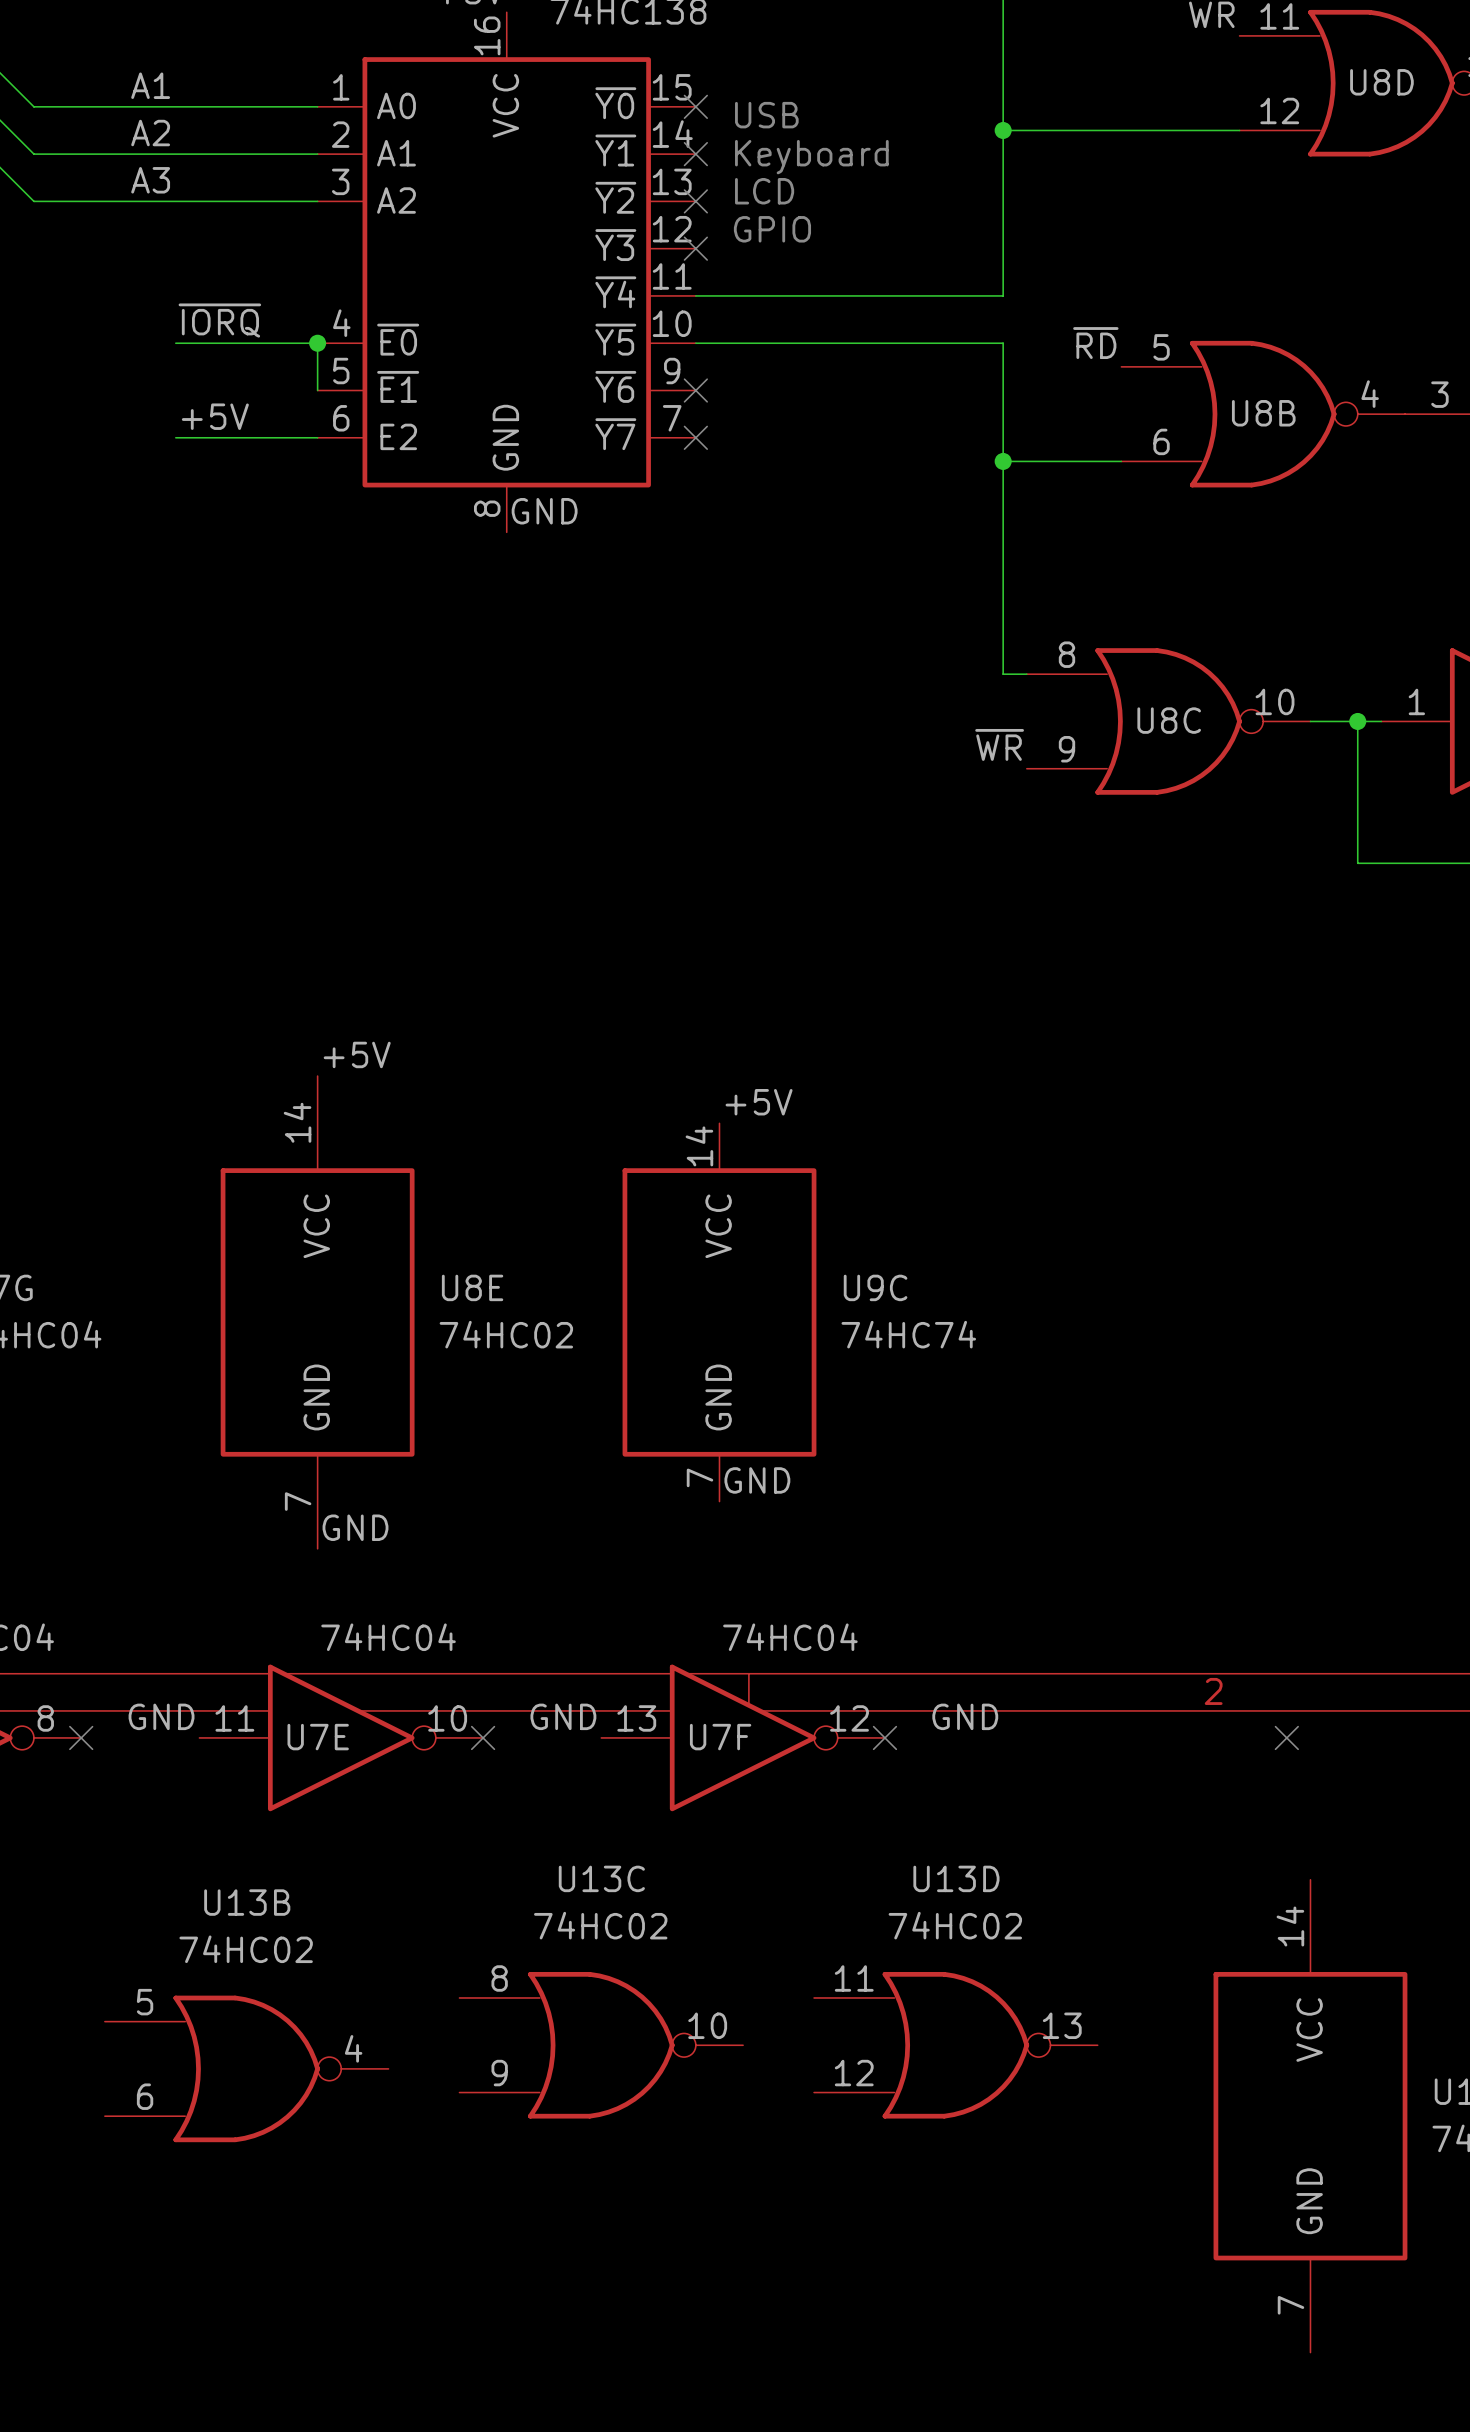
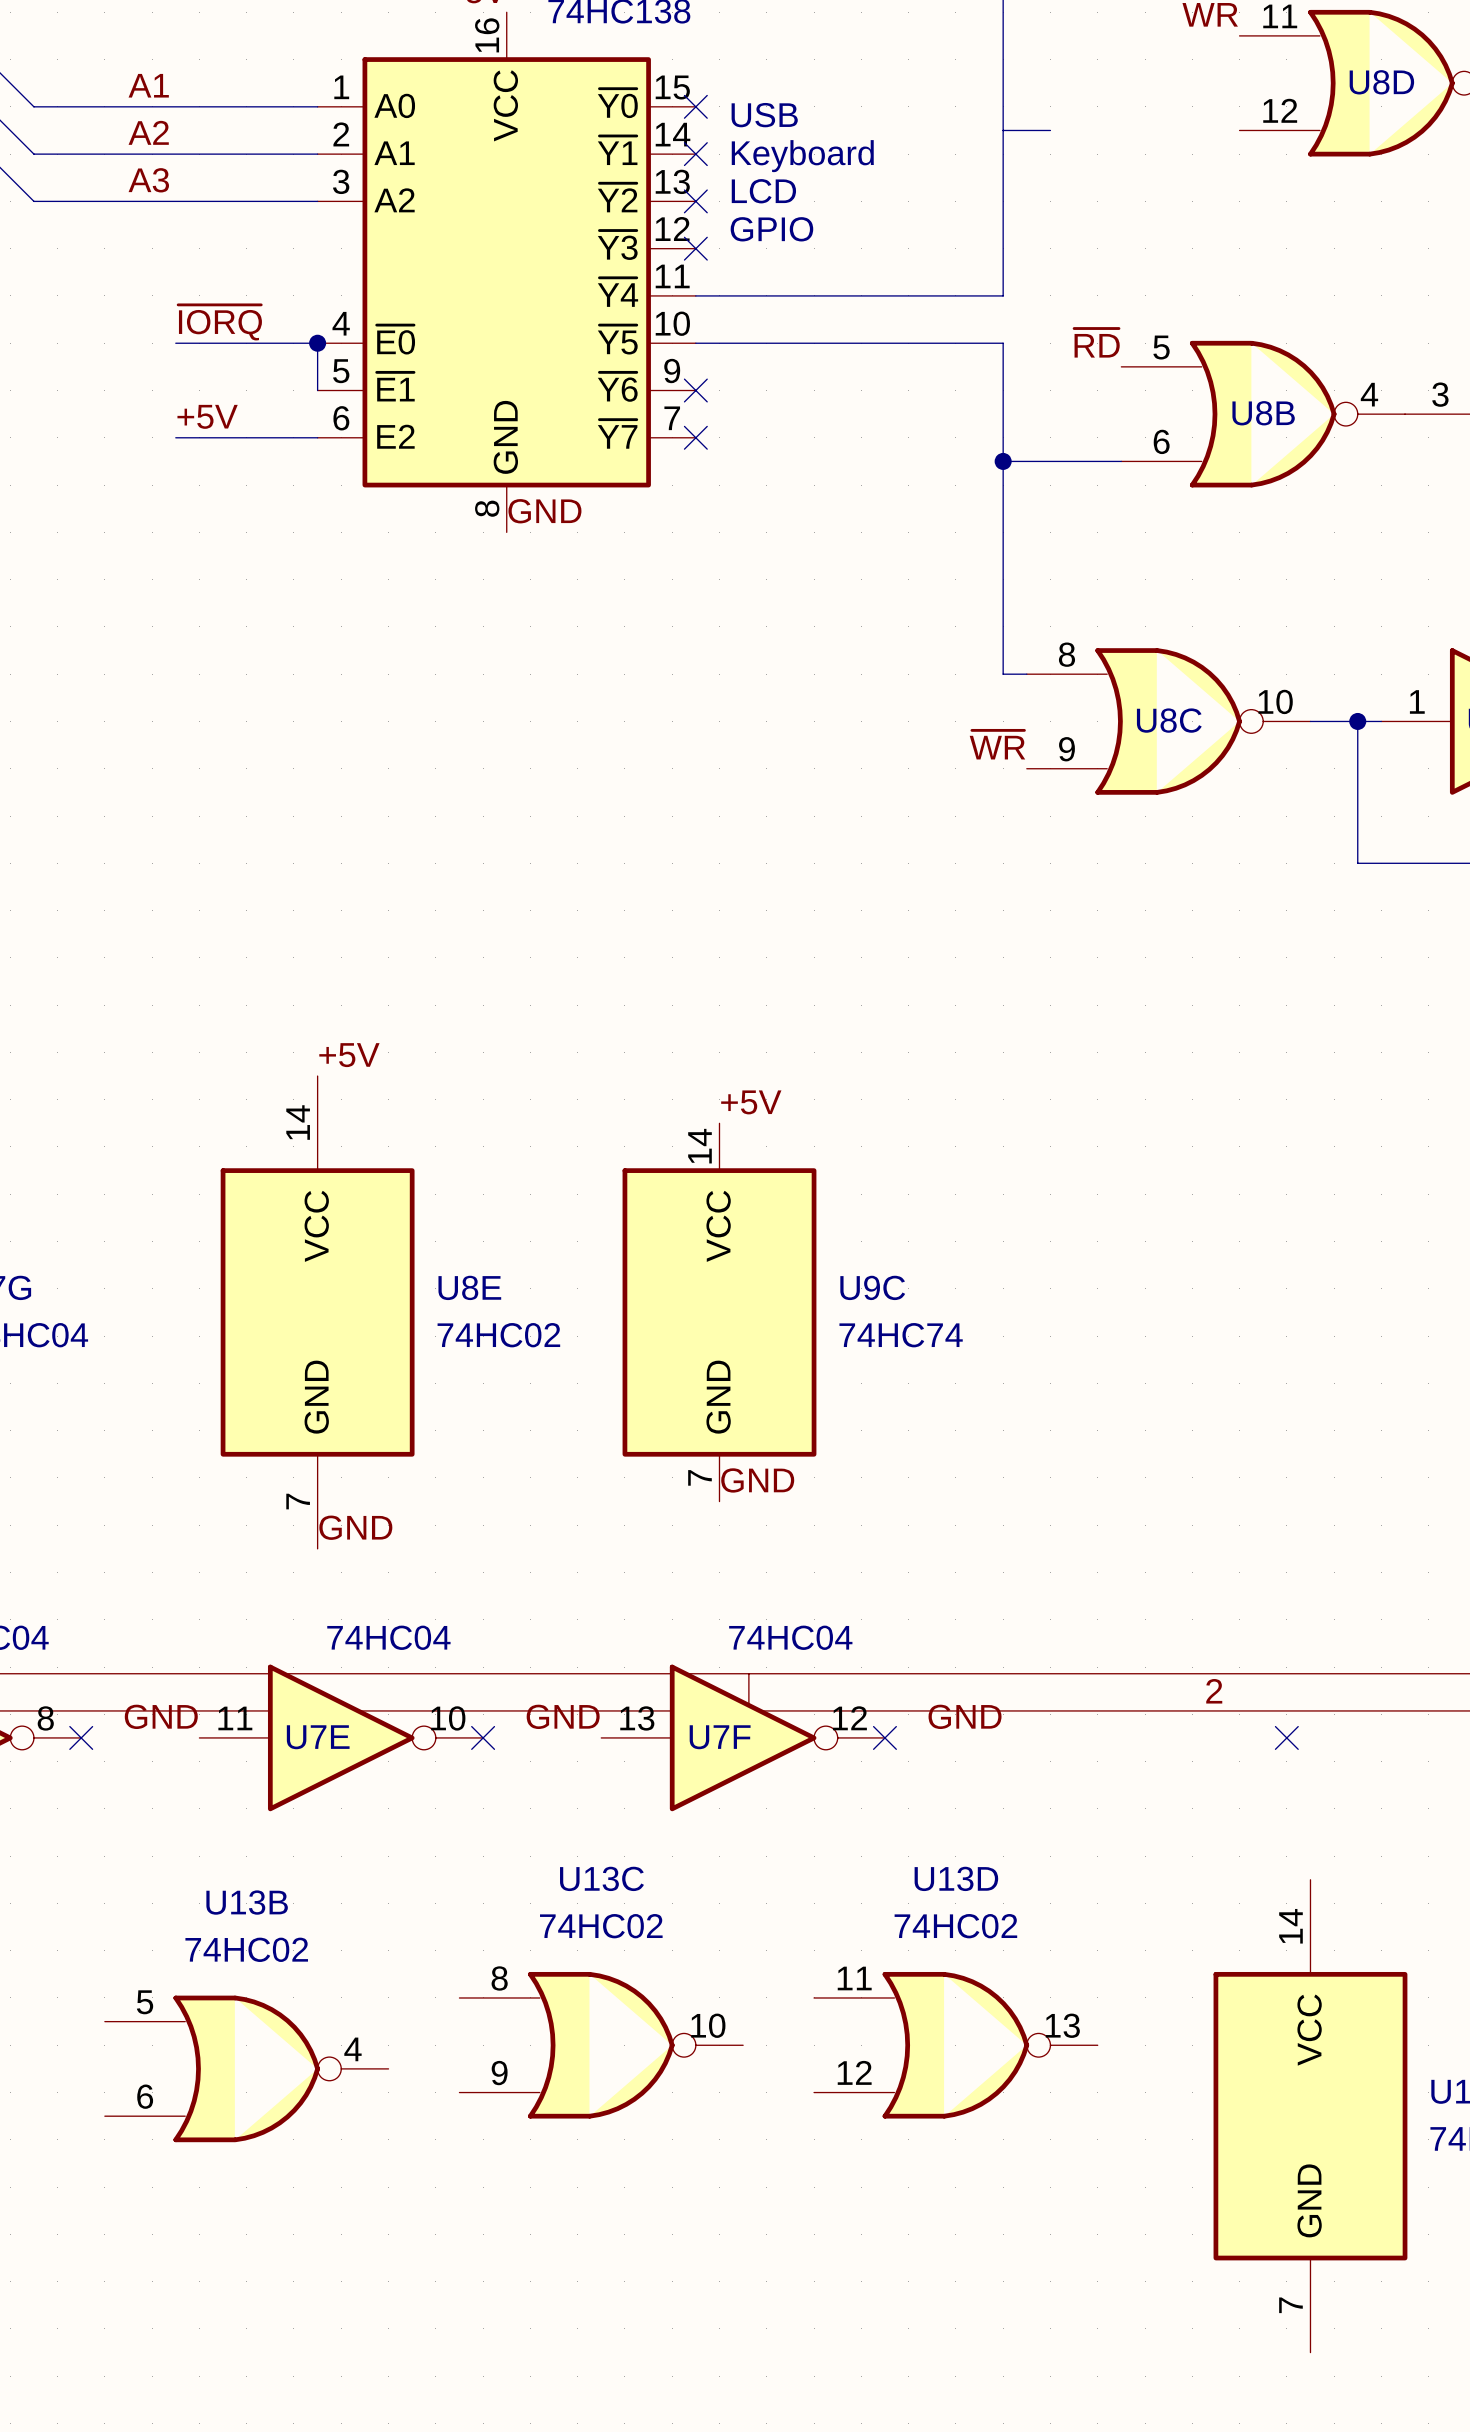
junction: (1003, 130) -> none
wire: (1050, 130) (1239, 130) -> none

